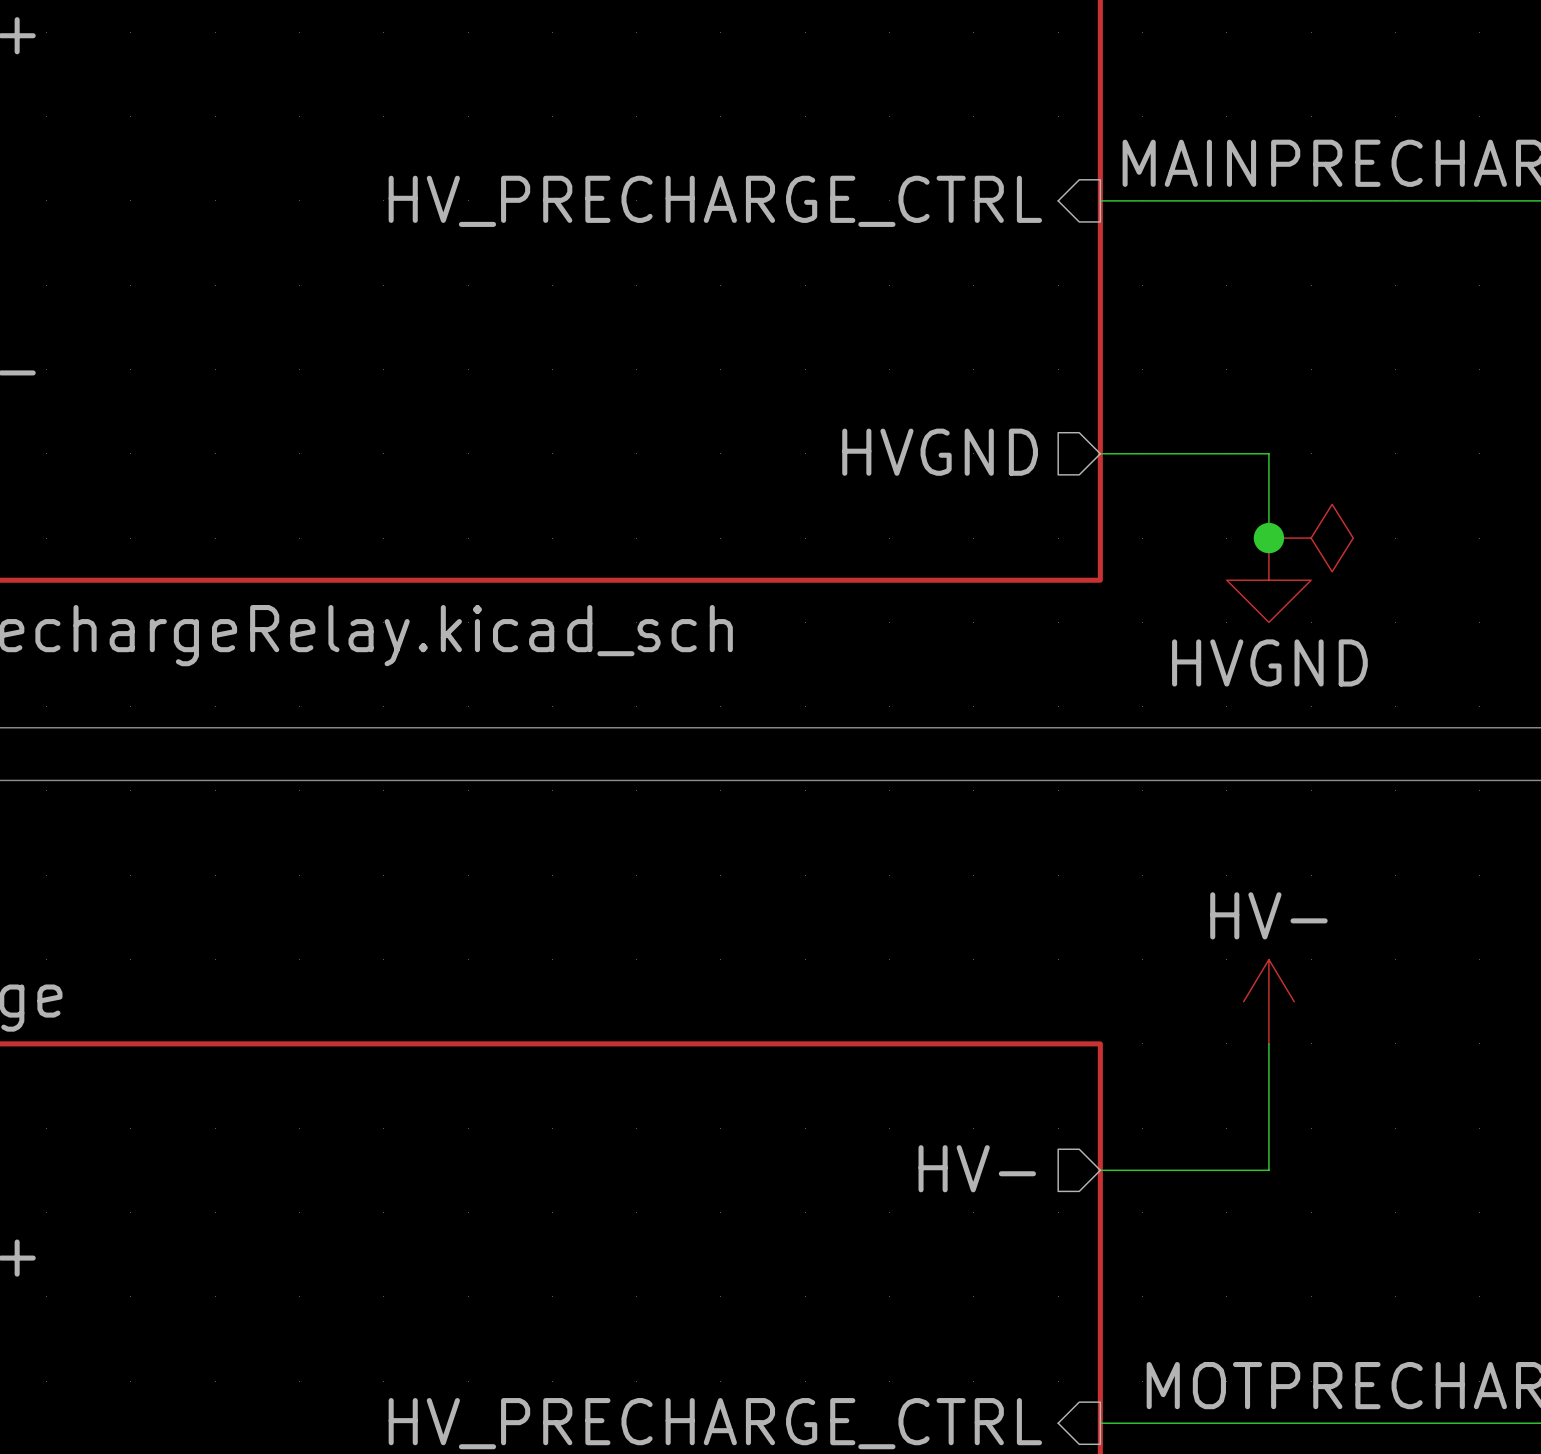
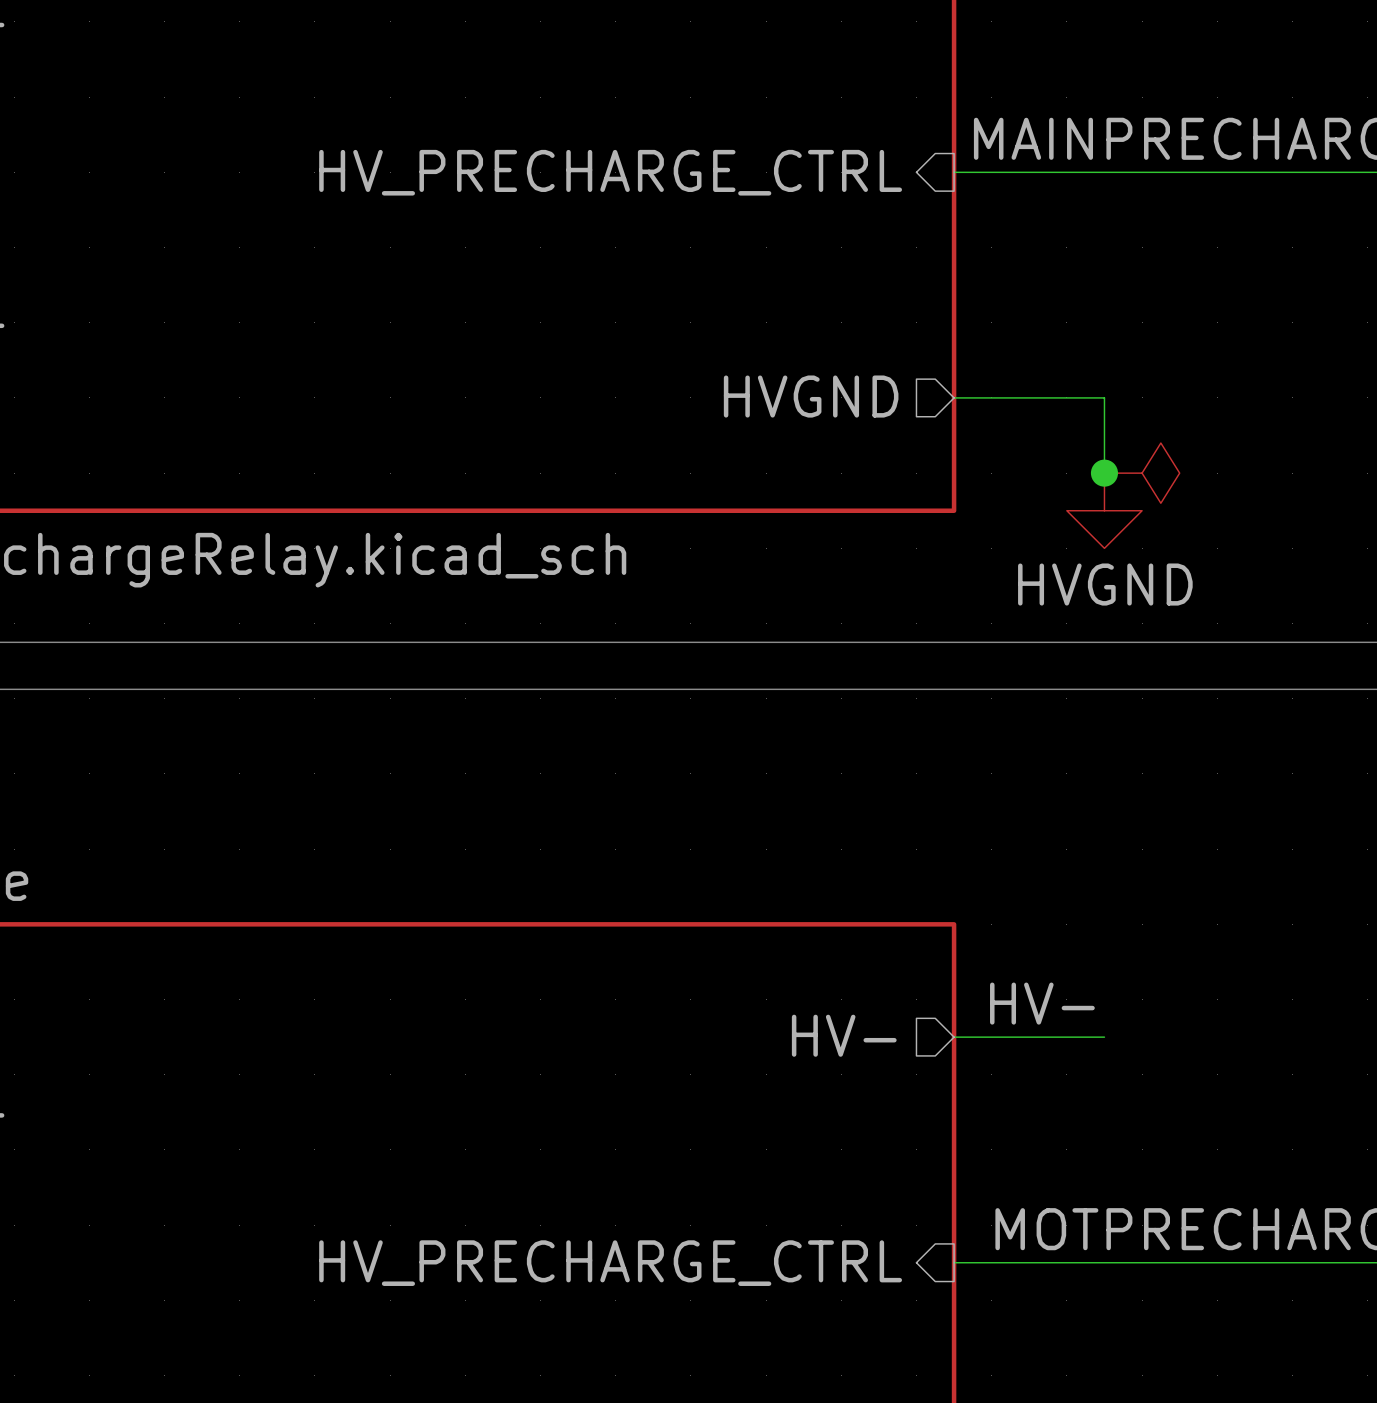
power symbol: HV- (1268, 1001) -> none
wire: (1268, 1043) (1268, 1170) -> none
label: none -> HV- (1042, 1003)

